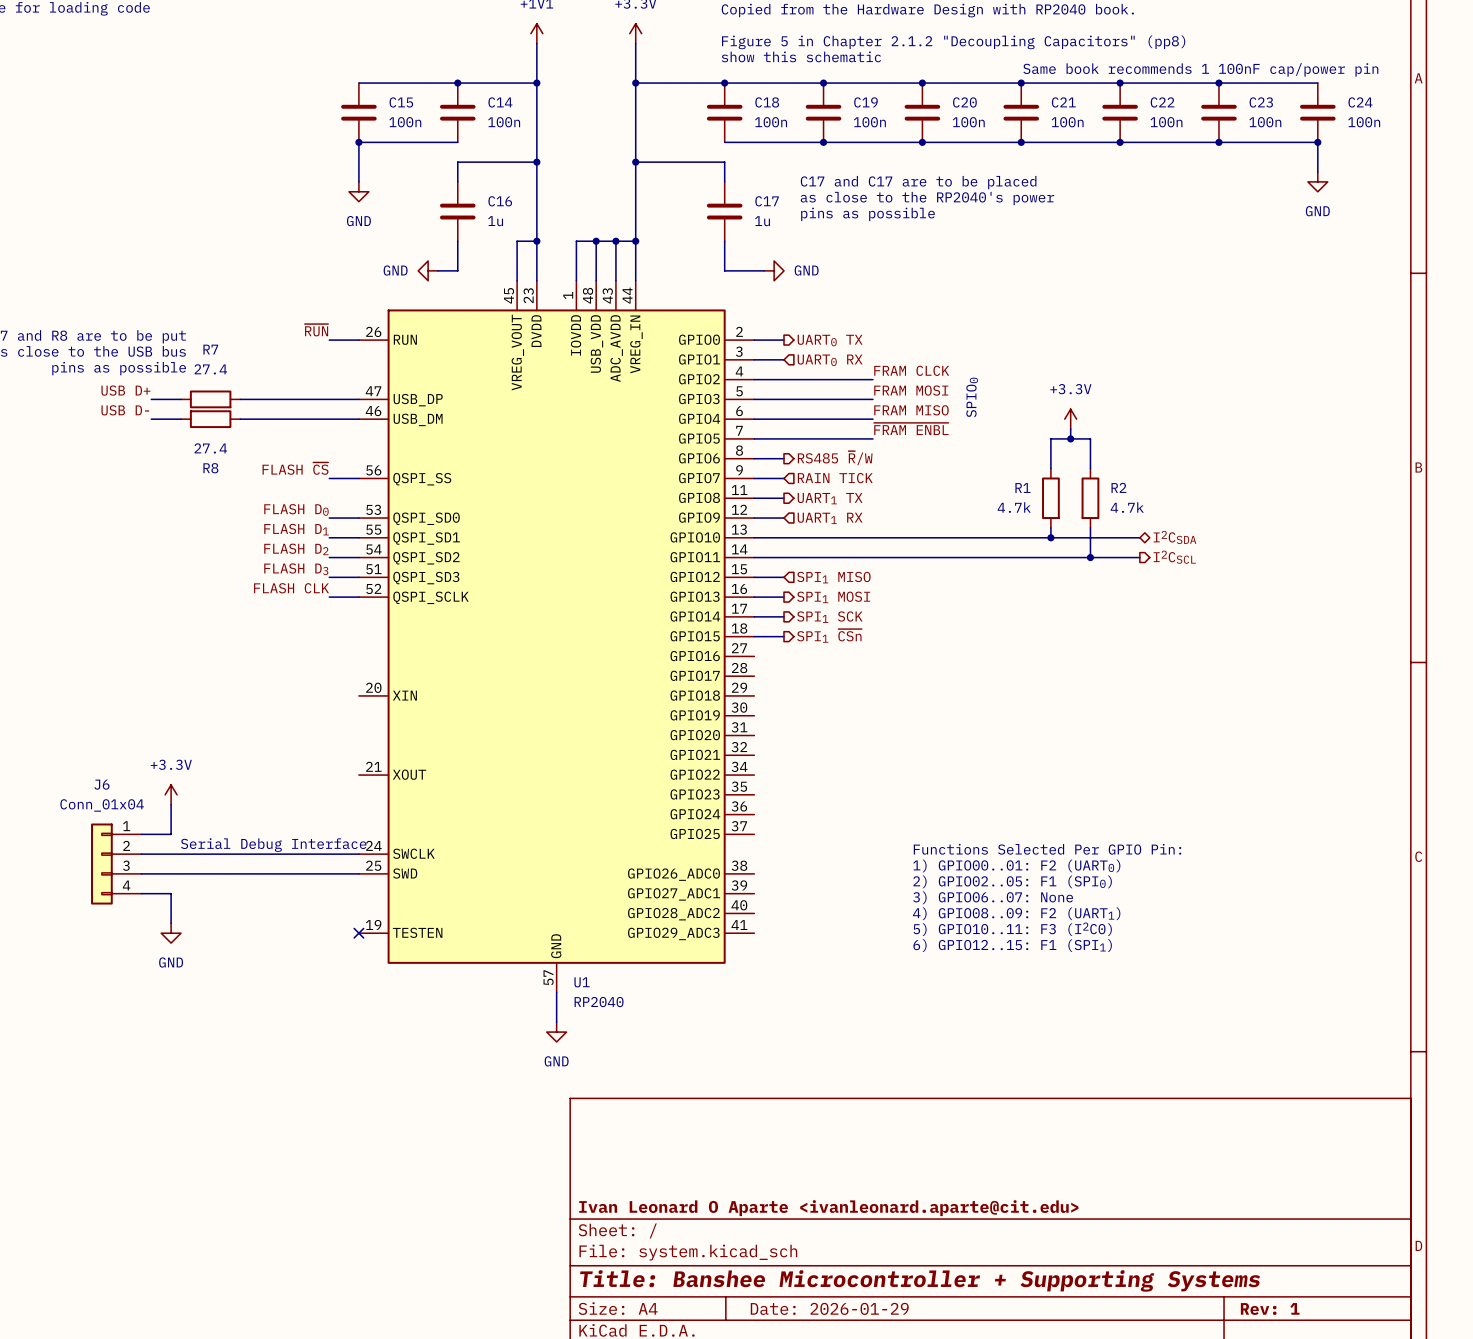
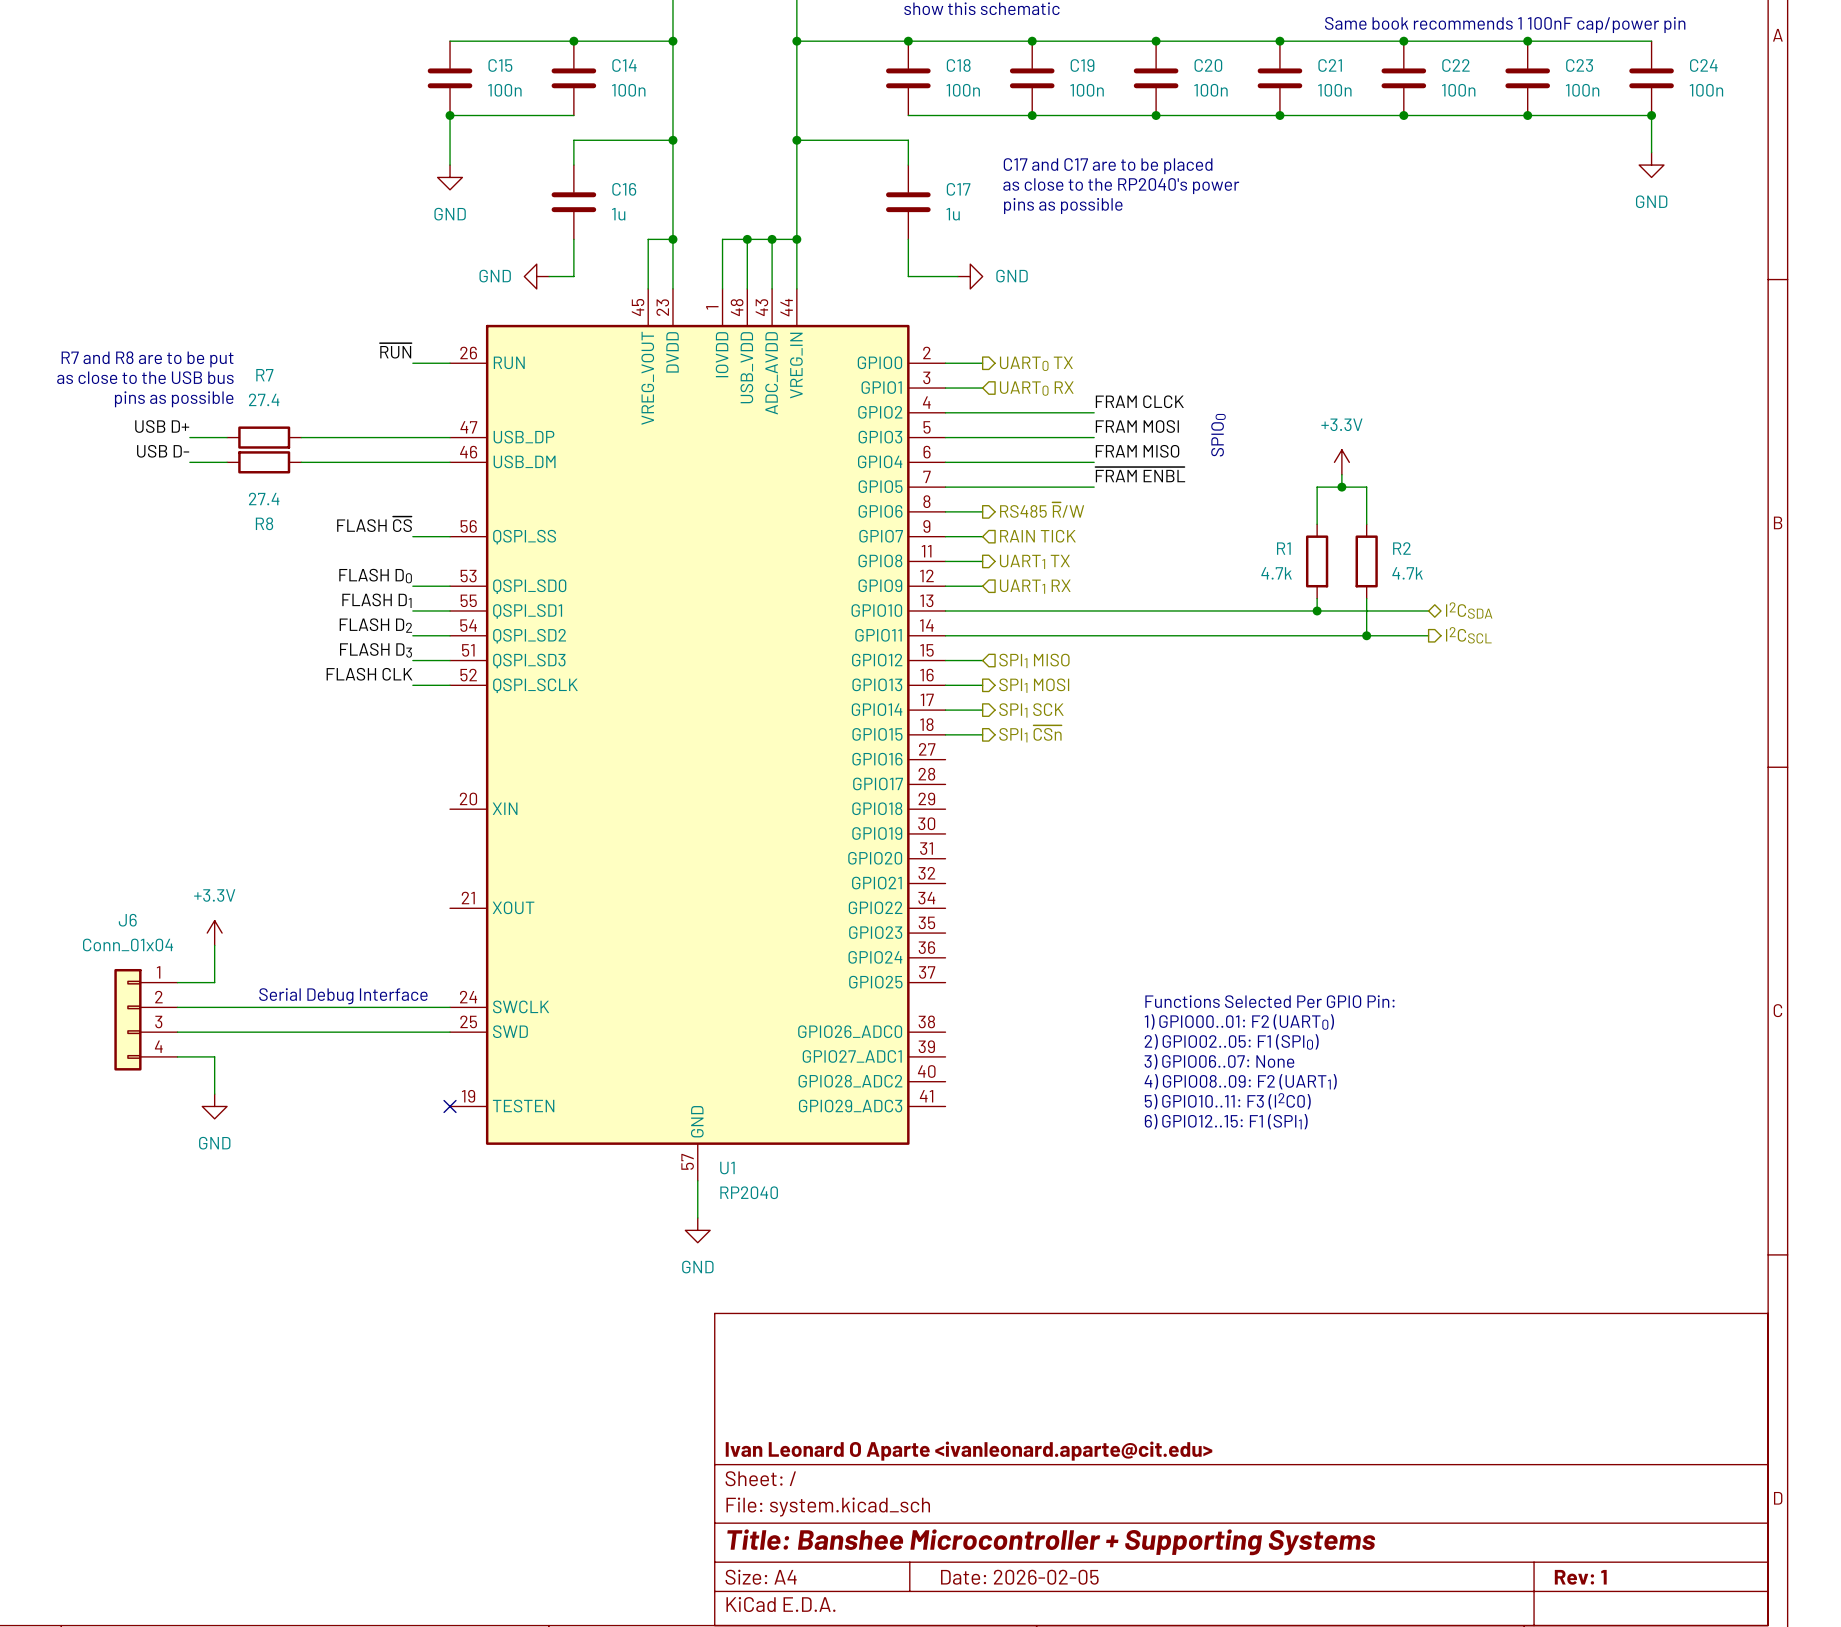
title block: Date: 2026-01-29 (829, 1308) -> Date: 2026-02-05 (1019, 1577)

